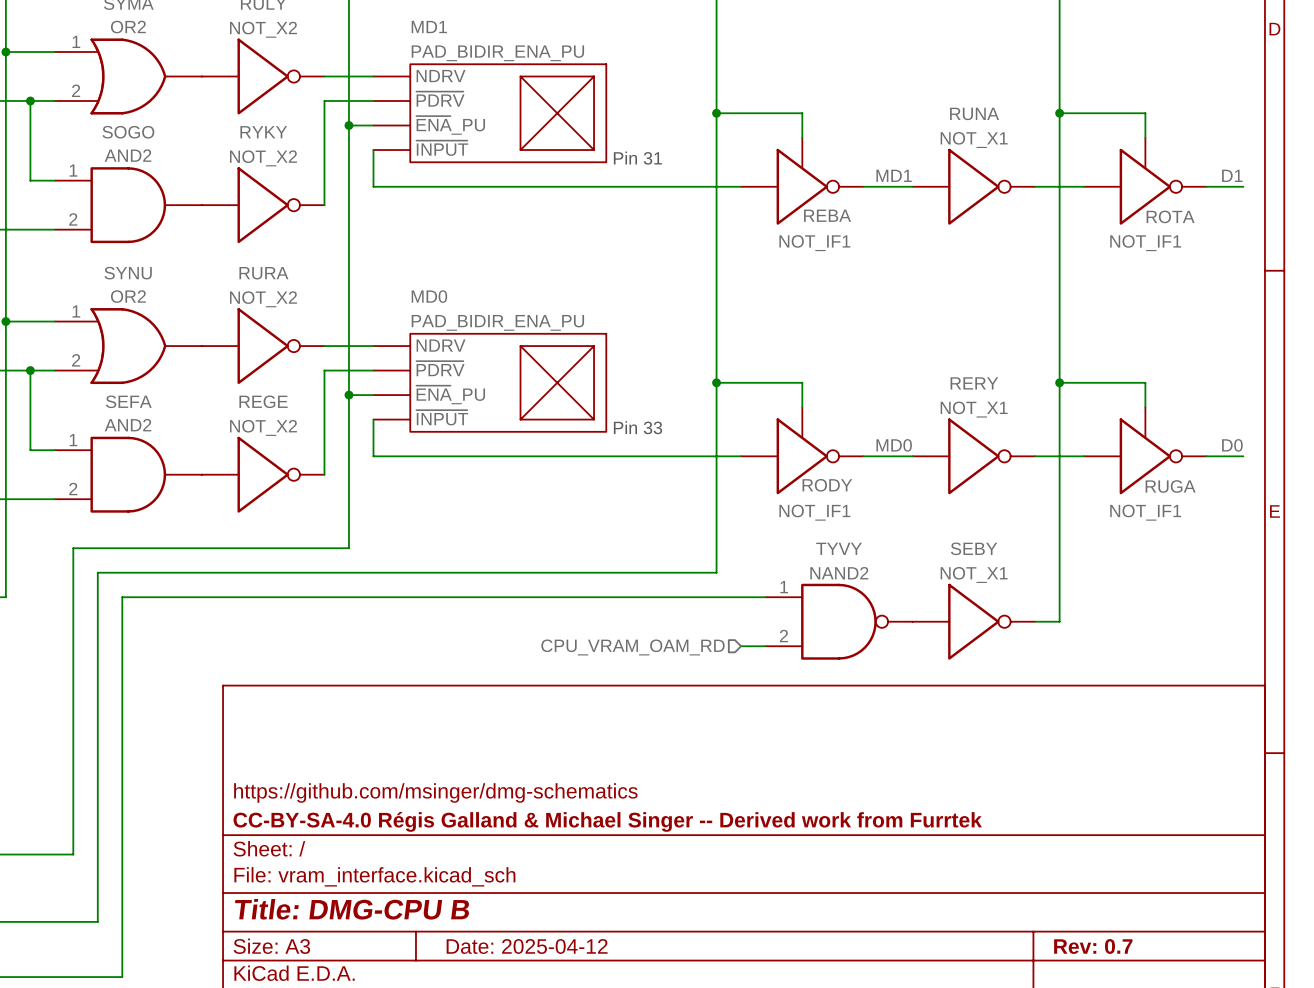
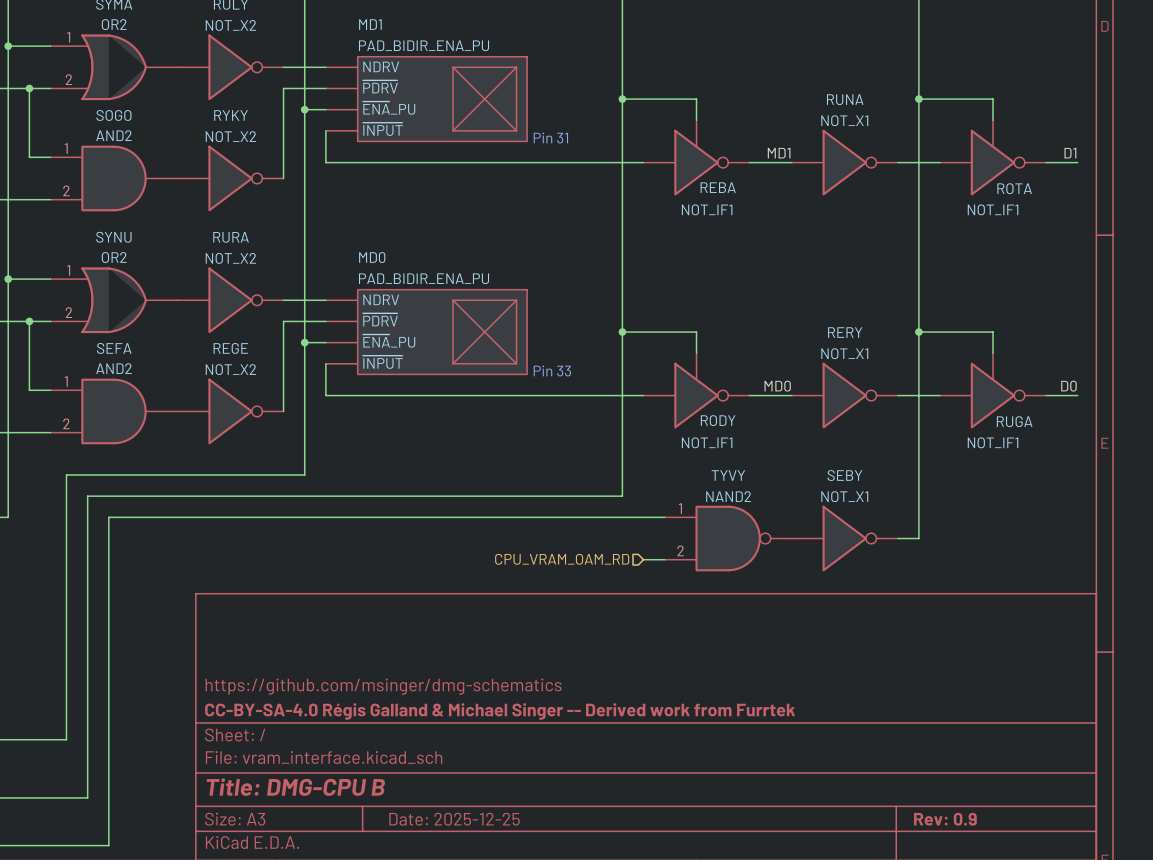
title block: Date: 2025-04-12 (527, 946) -> Date: 2025-12-25 (454, 819)
title block: Rev: 0.7 (1093, 946) -> Rev: 0.9 (945, 819)

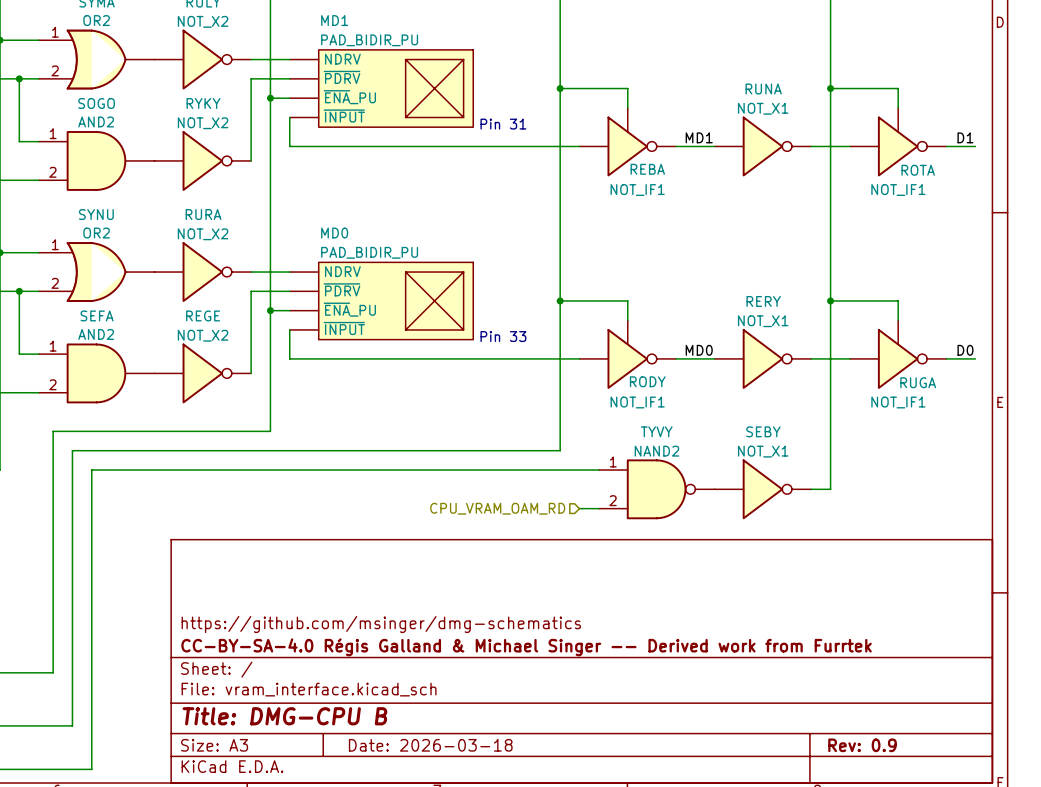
MD1 value: PAD_BIDIR_ENA_PU (424, 45) -> PAD_BIDIR_PU (369, 40)
MD0 value: PAD_BIDIR_ENA_PU (424, 278) -> PAD_BIDIR_PU (369, 252)
title block: Date: 2025-12-25 (454, 819) -> Date: 2026-03-18 (430, 745)

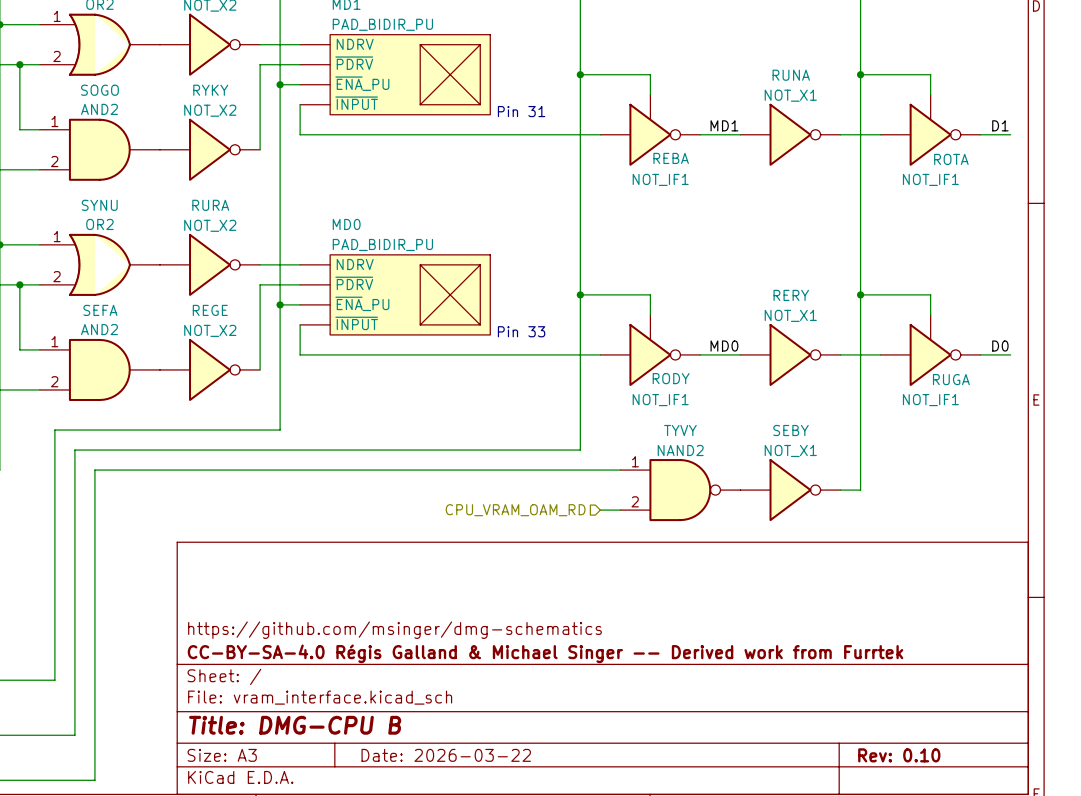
title block: Date: 2026-03-18 (430, 745) -> Date: 2026-03-22 (446, 755)
title block: Rev: 0.9 (862, 745) -> Rev: 0.10 (899, 755)

